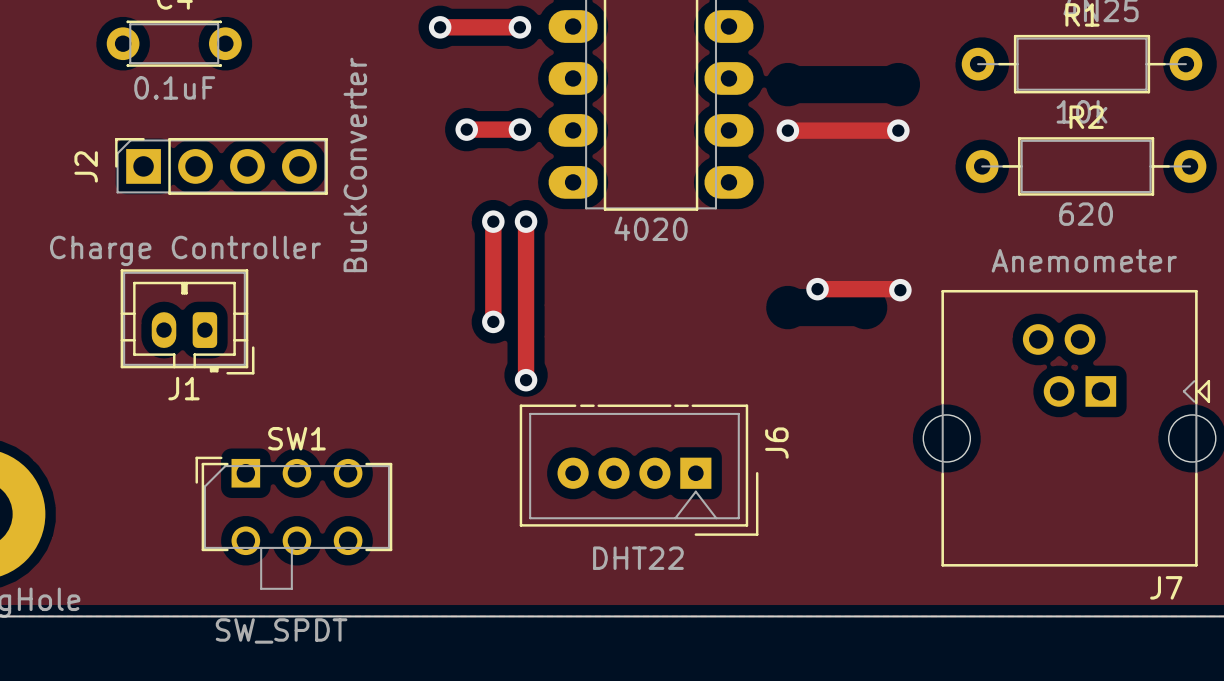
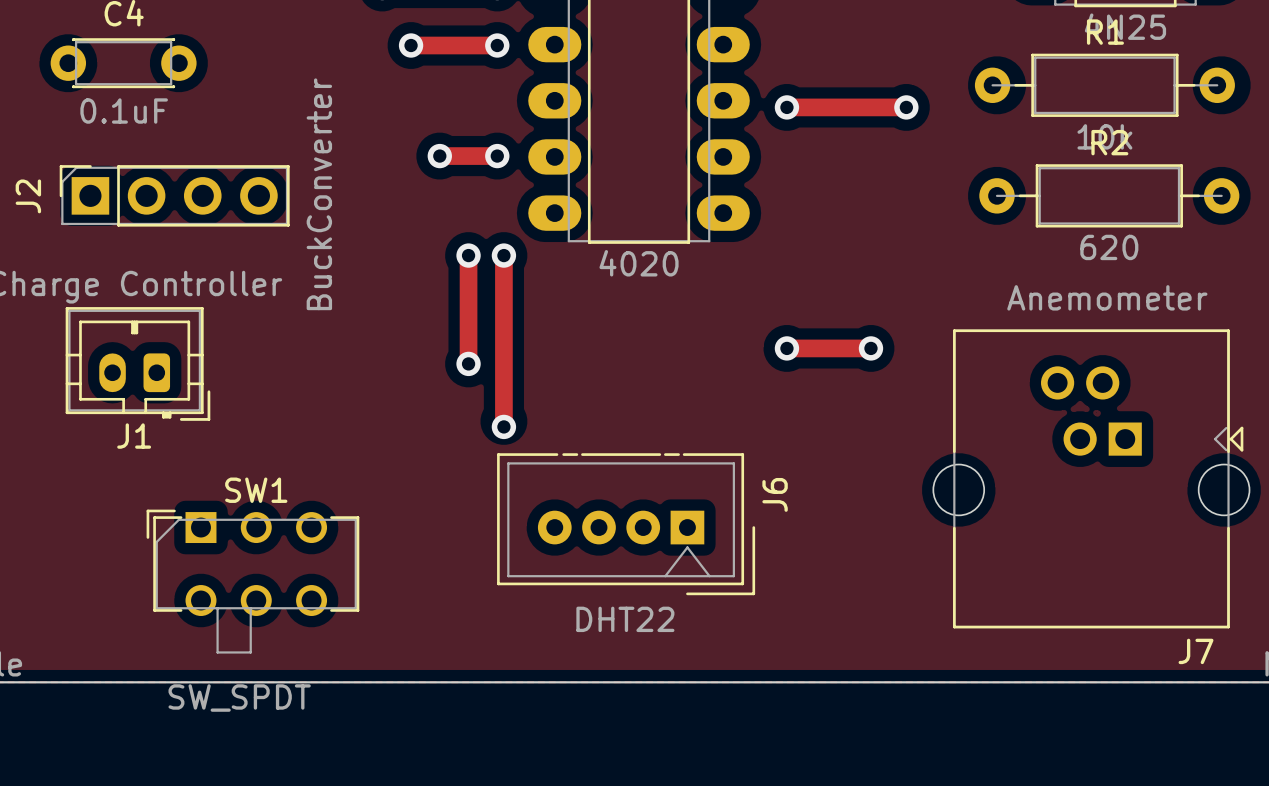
track: (787, 130) (898, 130) -> (786, 107) (906, 107)
via position: (787, 130) -> (786, 107)
via position: (898, 130) -> (906, 107)
track: (817, 289) (900, 290) -> none
via: (817, 289) -> none
via: (900, 290) -> none
track: none -> (786, 348) (870, 348)
via: none -> (786, 348)
via: none -> (870, 348)

